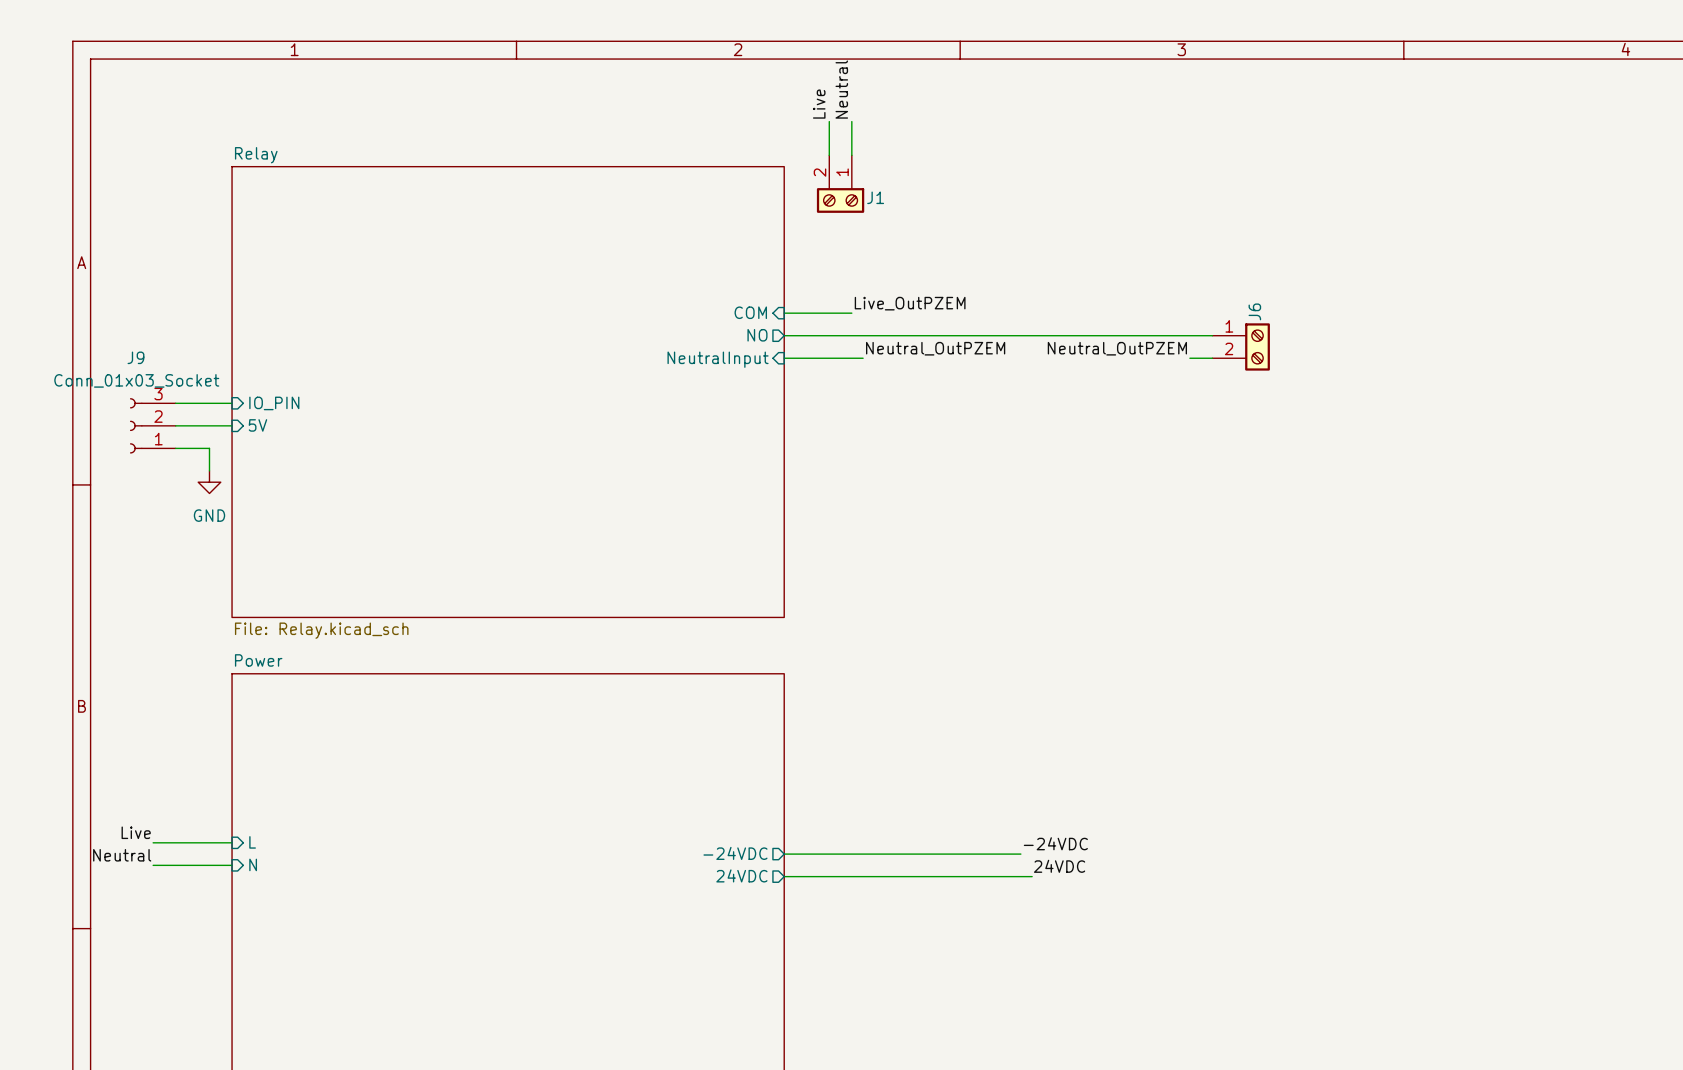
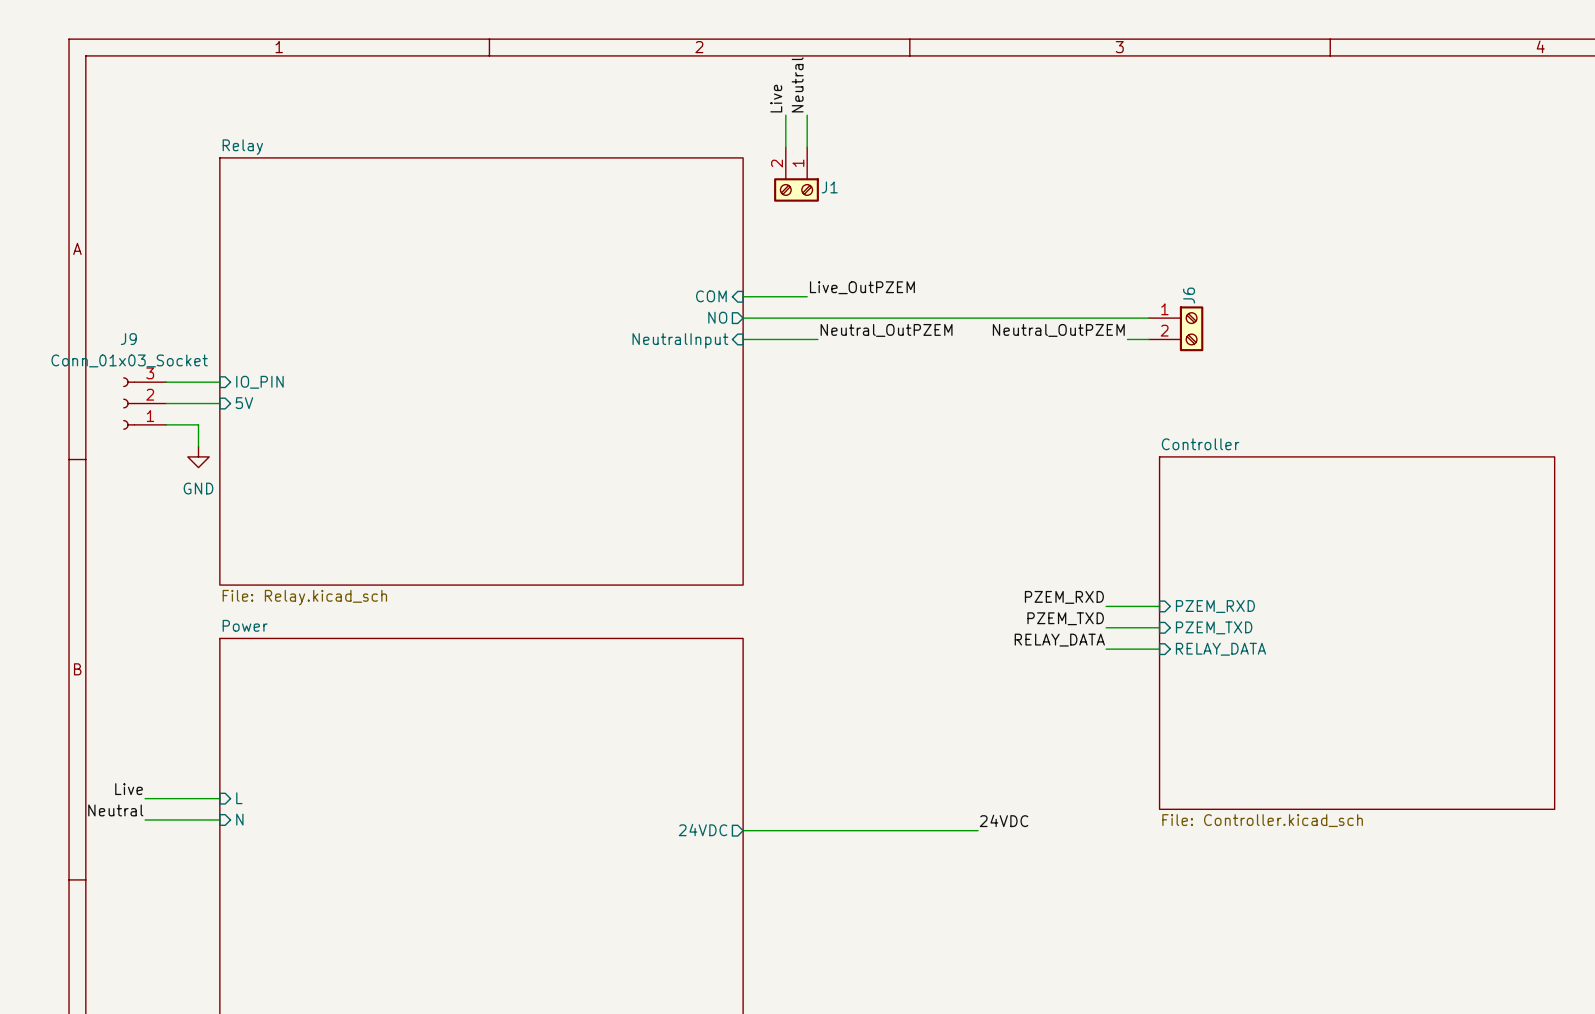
label: none -> PZEM_RXD (1064, 597)
wire: none -> (1106, 606) (1159, 606)
sheet pin: none -> PZEM_RXD (1215, 606)
label: none -> PZEM_TXD (1065, 618)
wire: none -> (1106, 627) (1159, 627)
sheet pin: none -> PZEM_TXD (1214, 627)
sheet Controller: none -> File: Controller.kicad_sch (1357, 633)
label: none -> RELAY_DATA (1059, 640)
wire: none -> (1106, 649) (1159, 649)
sheet pin: none -> RELAY_DATA (1221, 649)
label: -24VDC (1055, 843) -> none
sheet pin: -24VDC (735, 853) -> none
wire: (784, 854) (1020, 854) -> none

